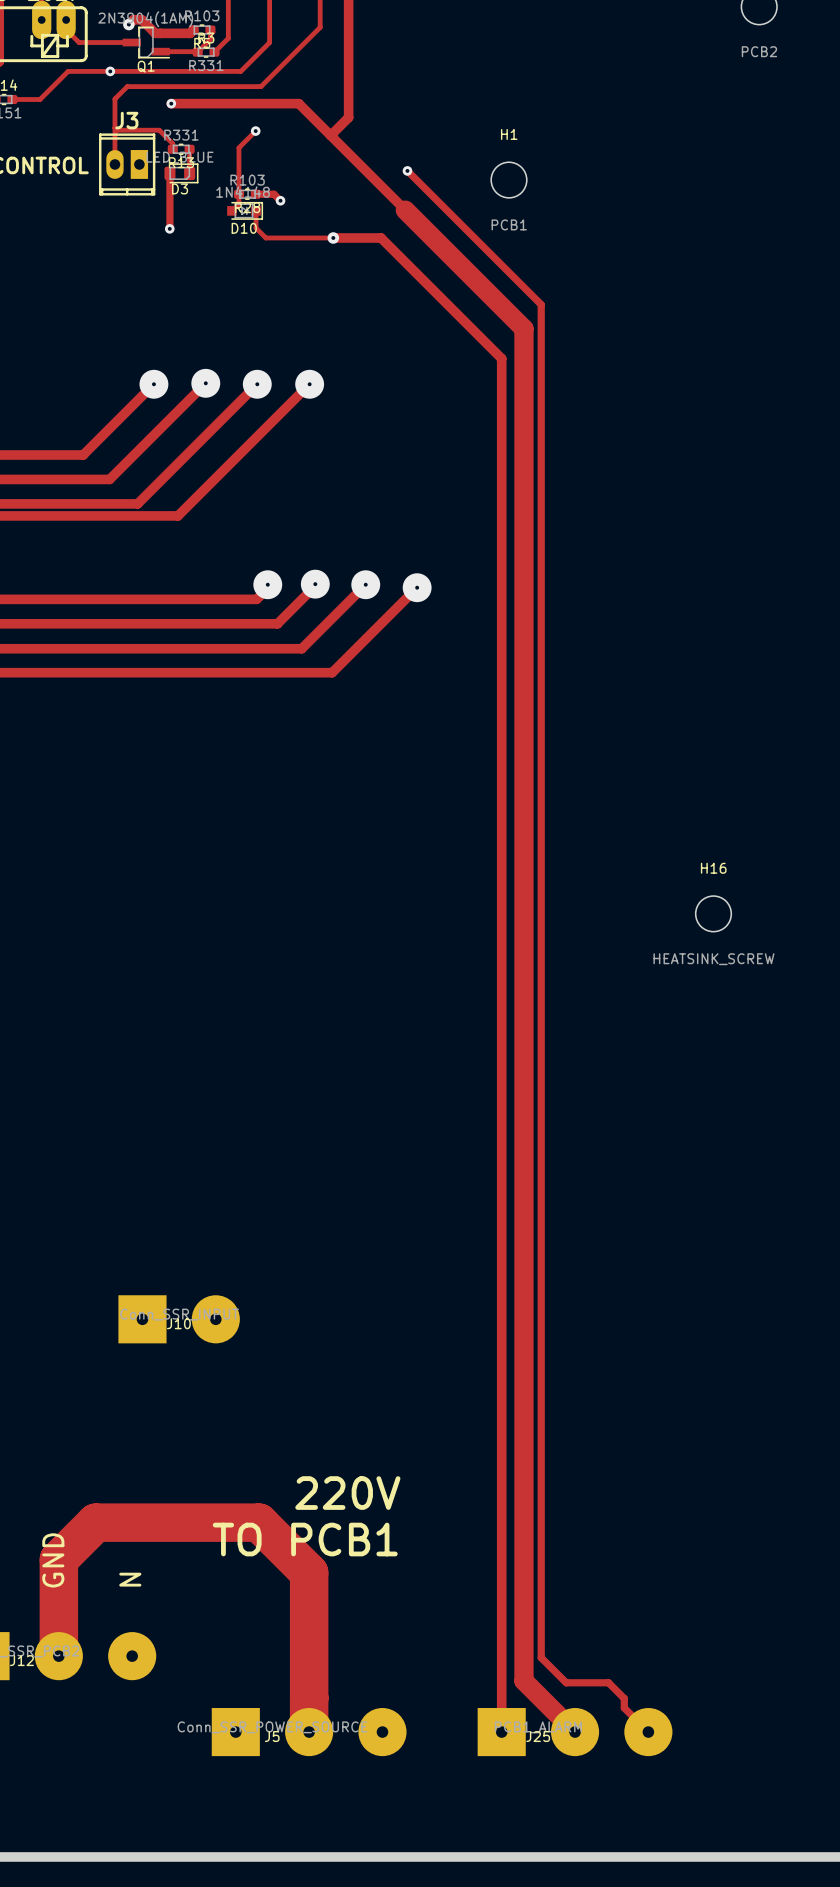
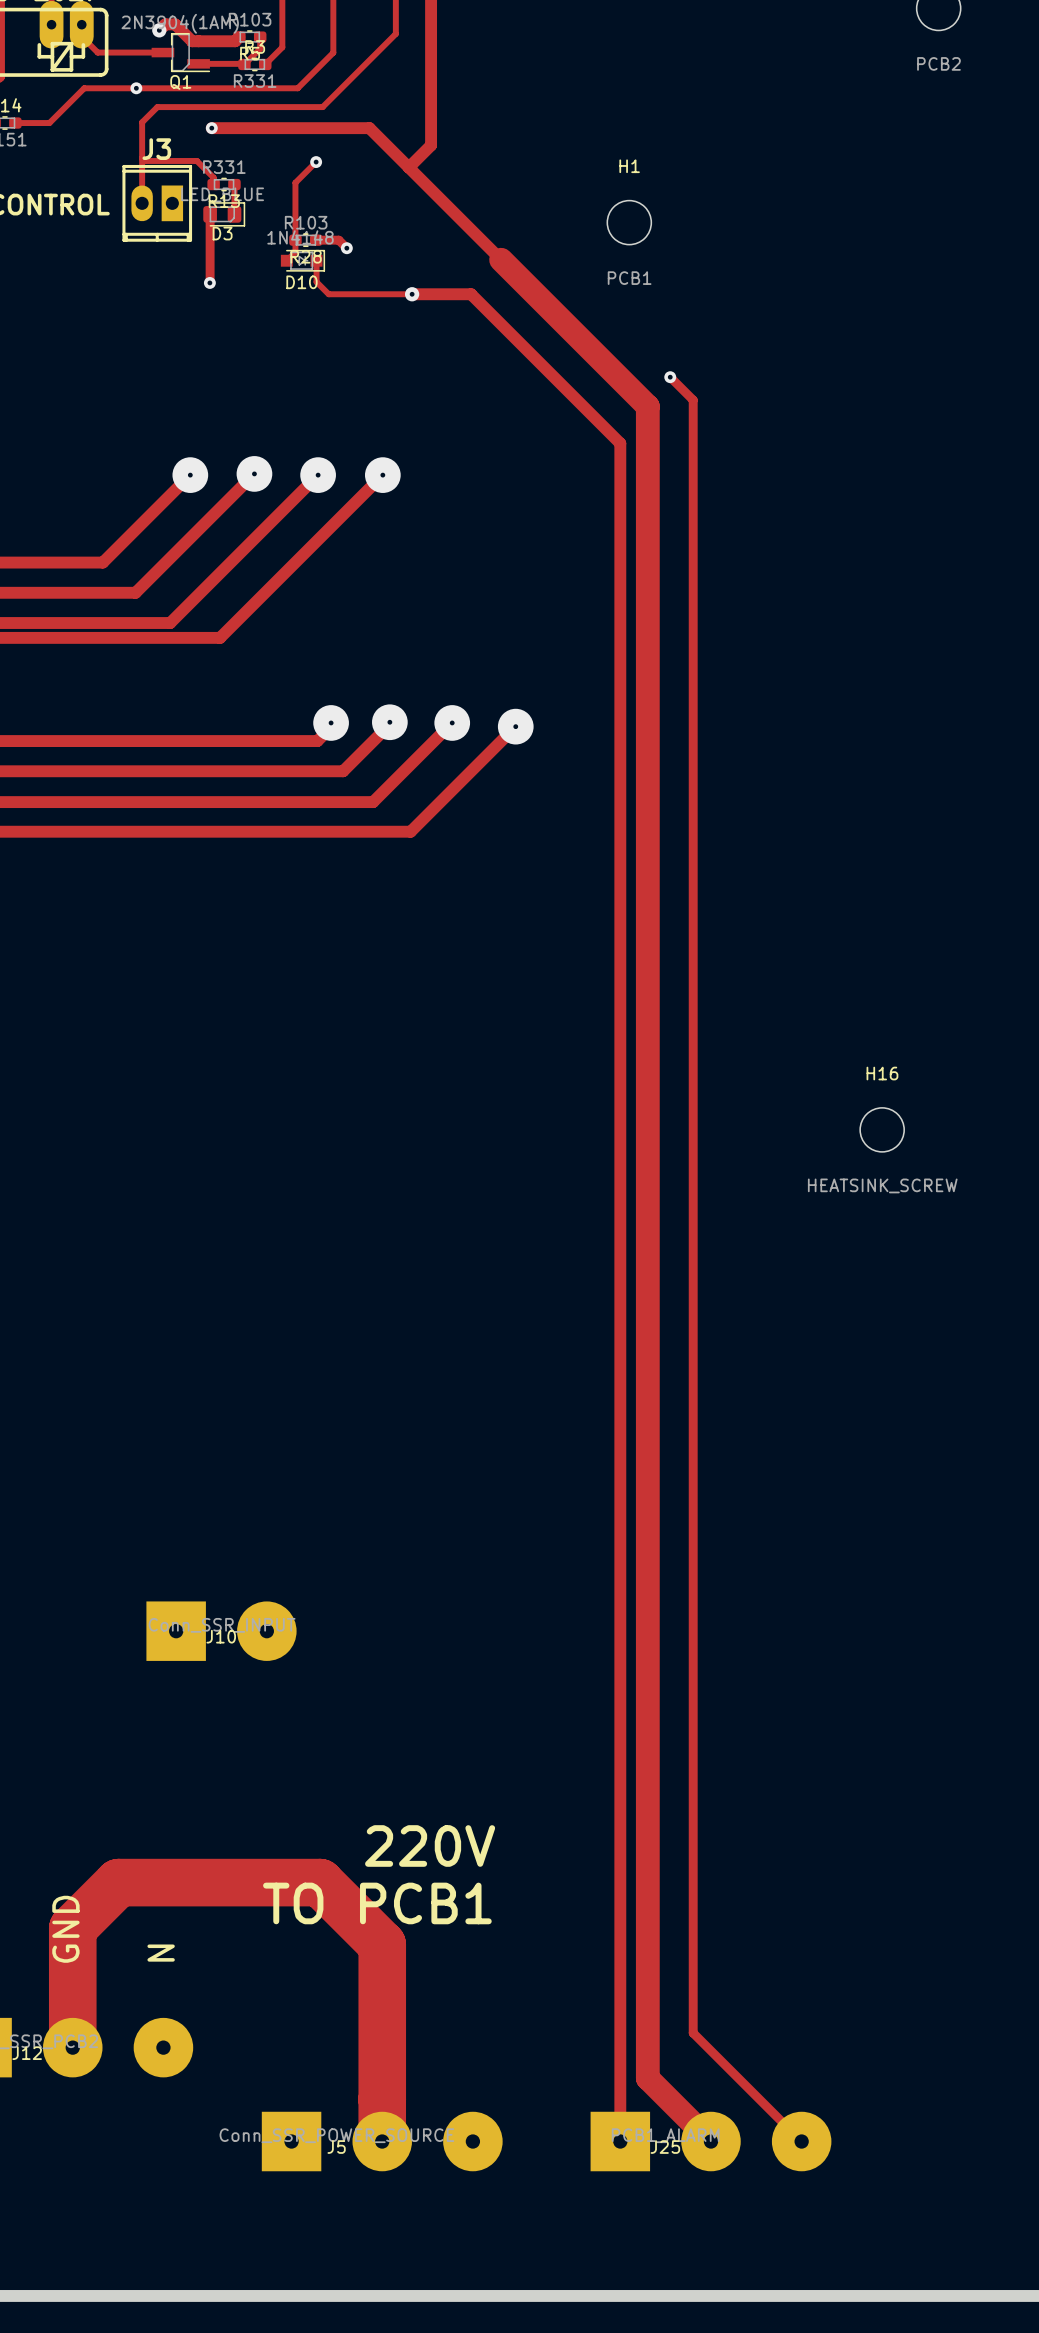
track: (407, 170) (541, 304) (541, 1657) (566, 1682) (608, 1682) (624, 1698) (624, 1708) -> (670, 377) (693, 400) (693, 2033) (771, 2111)
via: (407, 170) -> none
via: none -> (670, 377)

